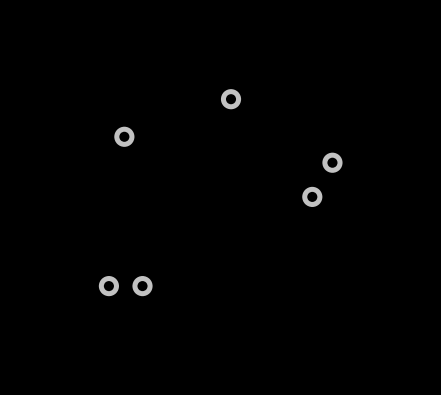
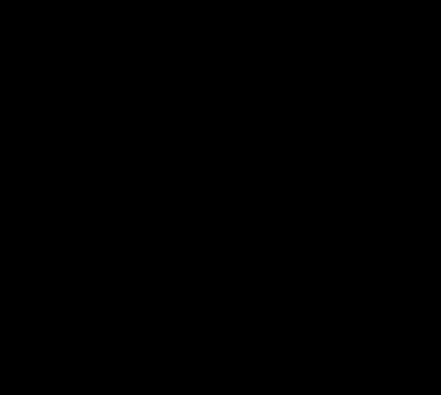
via: (231, 99) -> none
via: (124, 136) -> none
via: (332, 162) -> none
via: (312, 196) -> none
via: (108, 286) -> none
via: (142, 286) -> none

